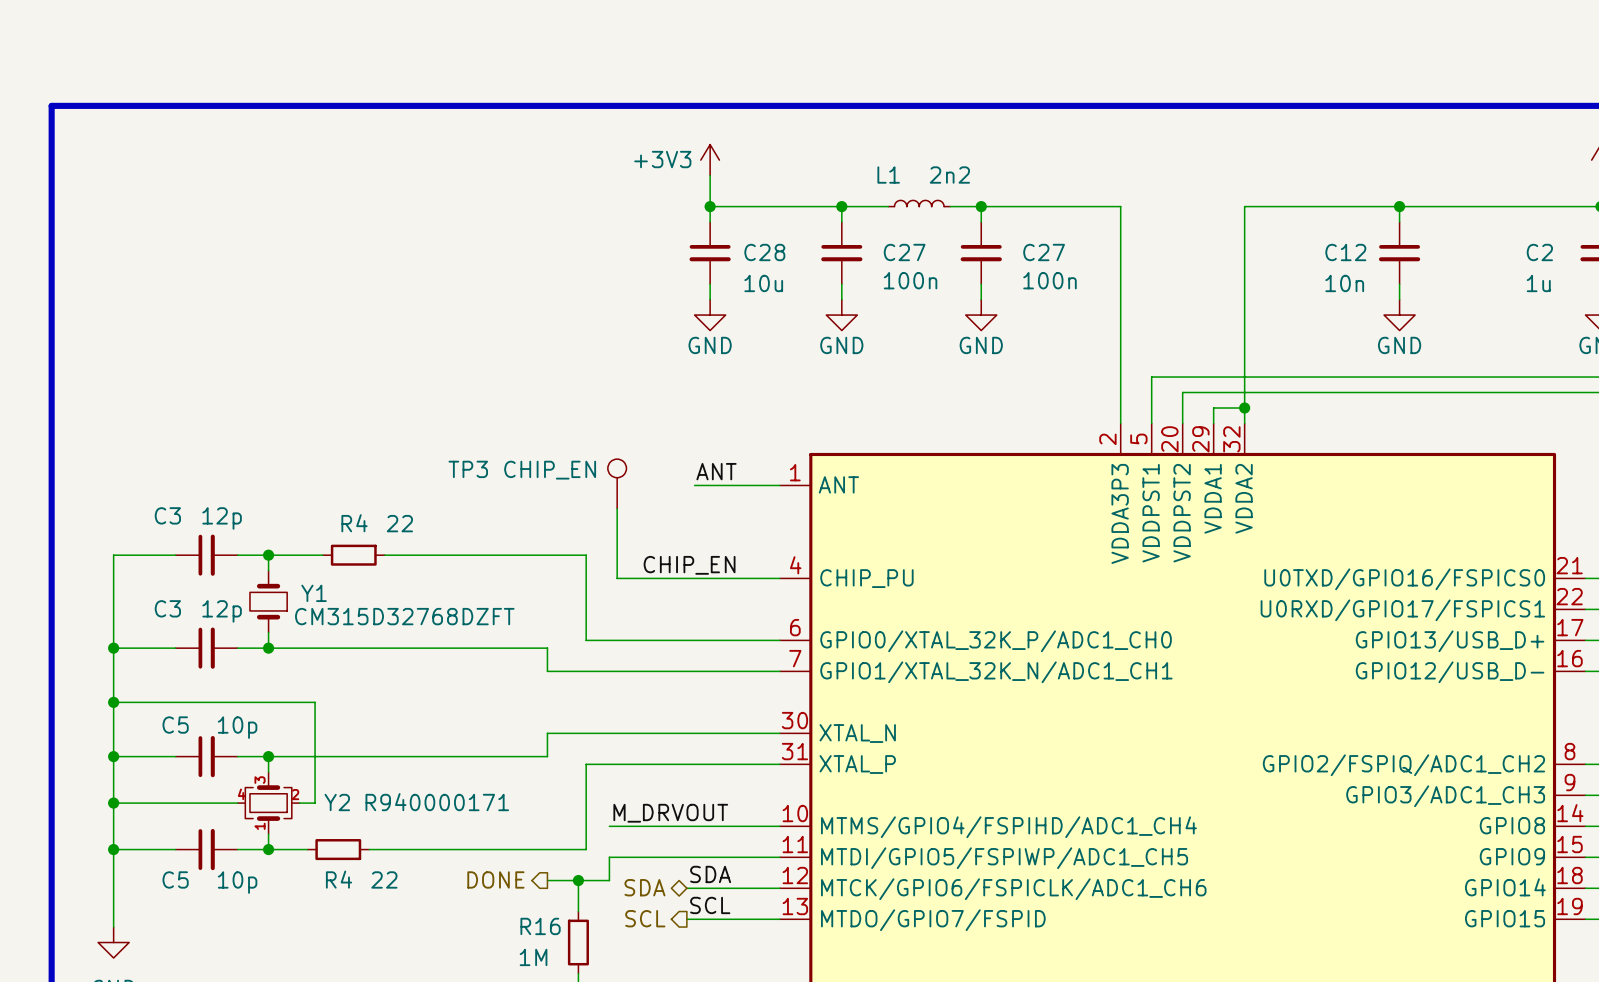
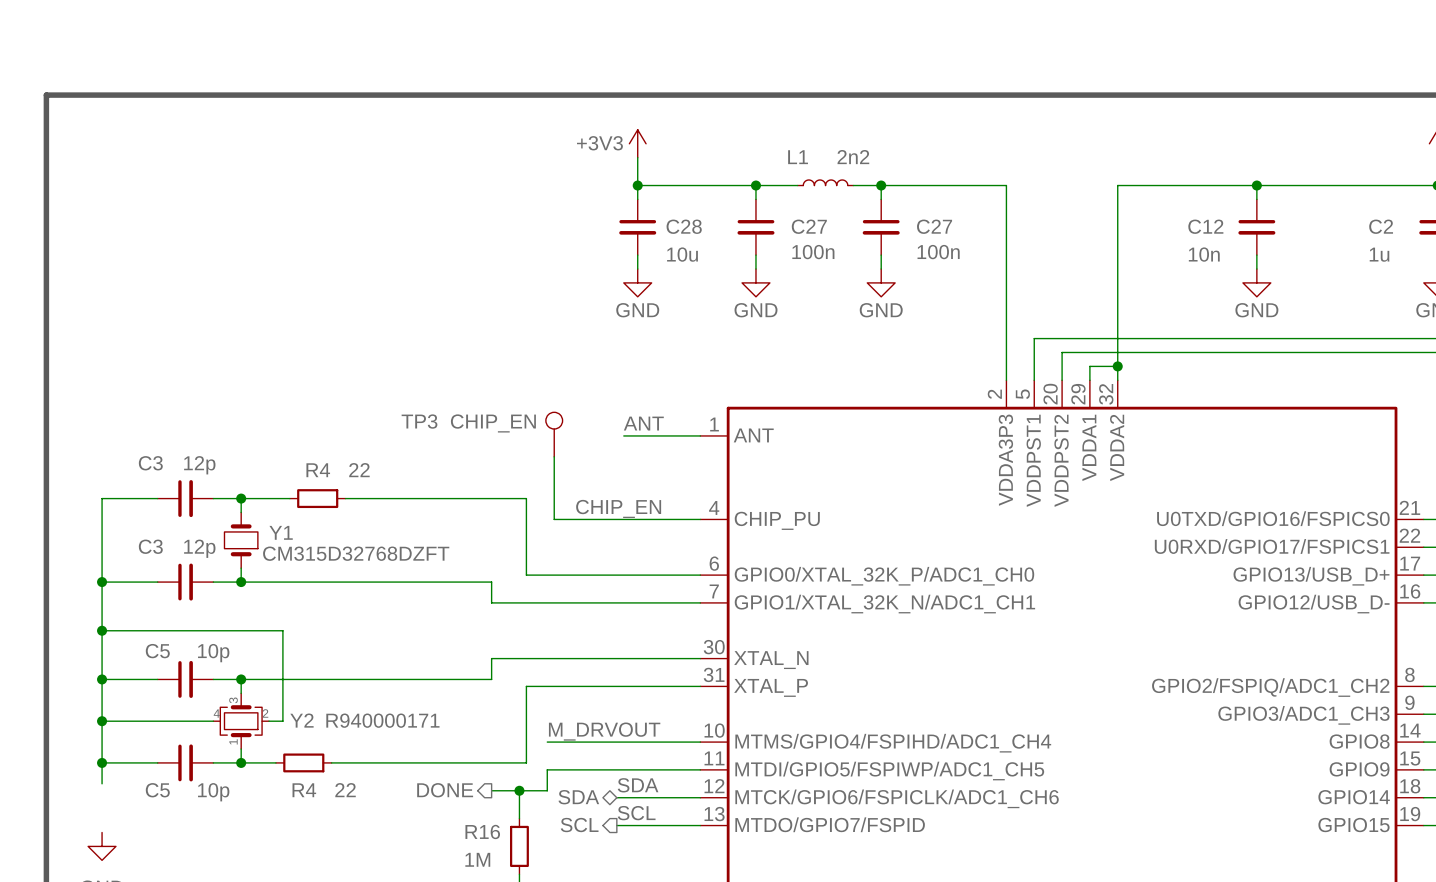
wire: (113, 872) (113, 927) -> none

